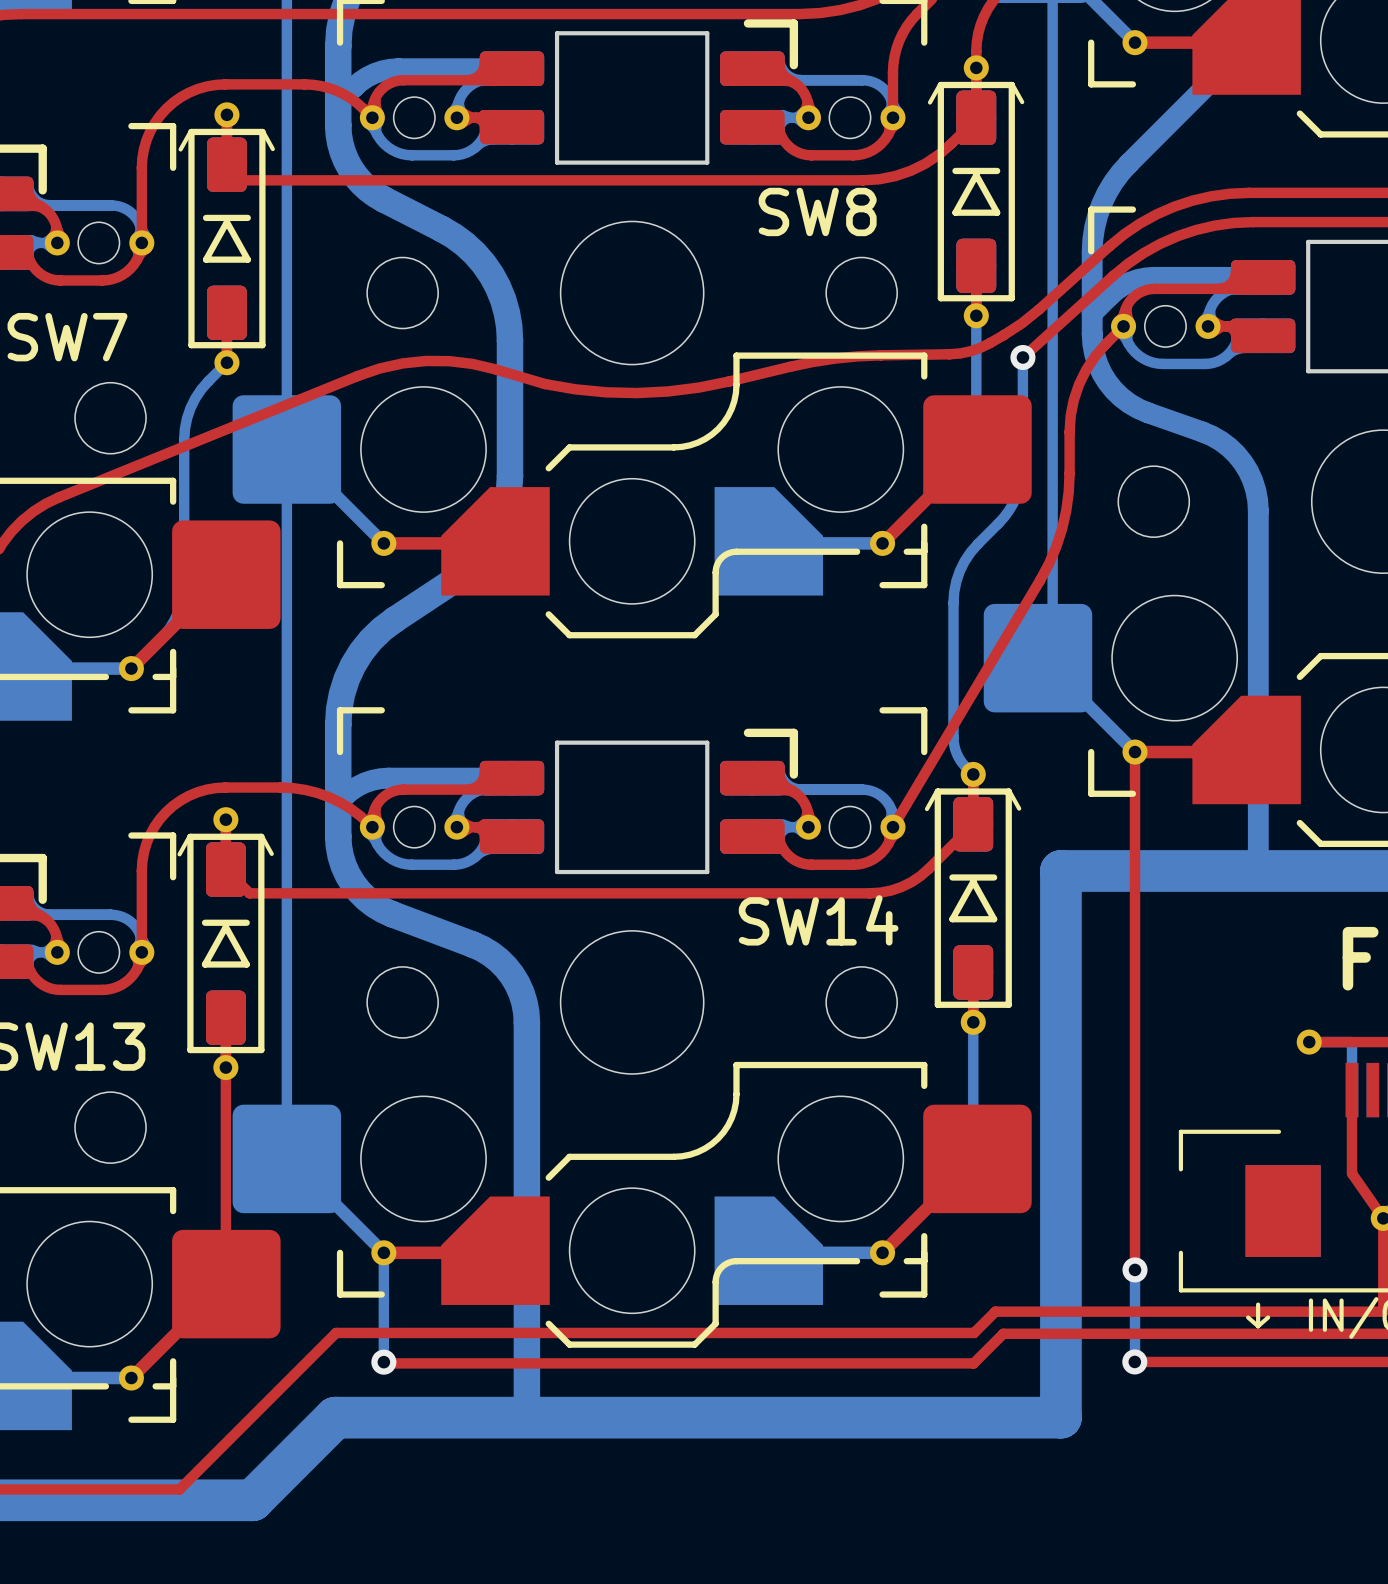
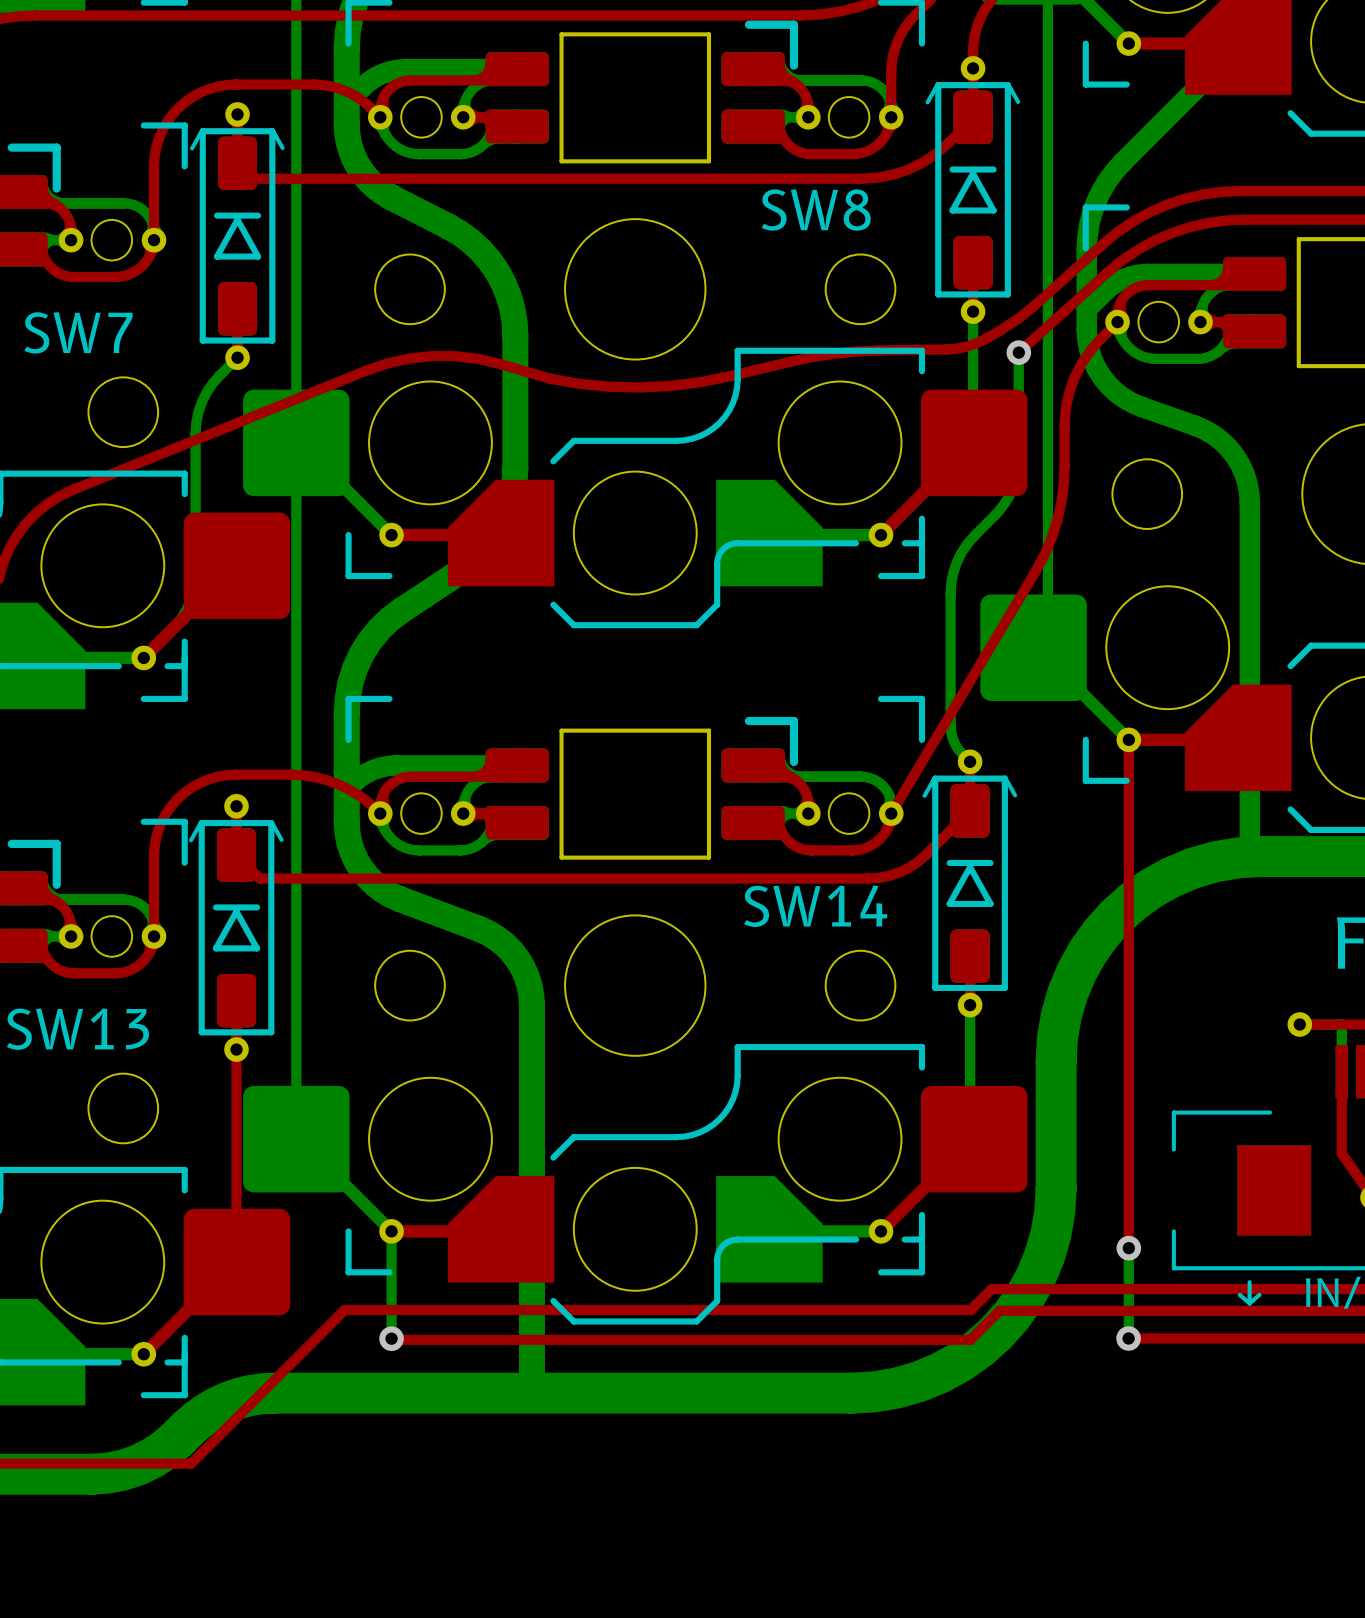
bottom track: (1269, 871) (1060, 871) (1060, 1079) -> (1260, 856) (1215, 861) (1172, 876) (1151, 888) (1116, 916) (1087, 952) (1067, 993) (1057, 1038) (1056, 1061)
bottom track: (1060, 1209) (1060, 1417) (852, 1417) -> (1056, 1188) (1050, 1233) (1035, 1277) (1024, 1297) (996, 1333) (960, 1361) (918, 1381) (874, 1391) (851, 1393)
bottom track: (335, 1417) (252, 1500) (78, 1500) -> (343, 1393) (262, 1393) (238, 1398) (206, 1413) (166, 1448) (152, 1457) (123, 1470) (91, 1474)

